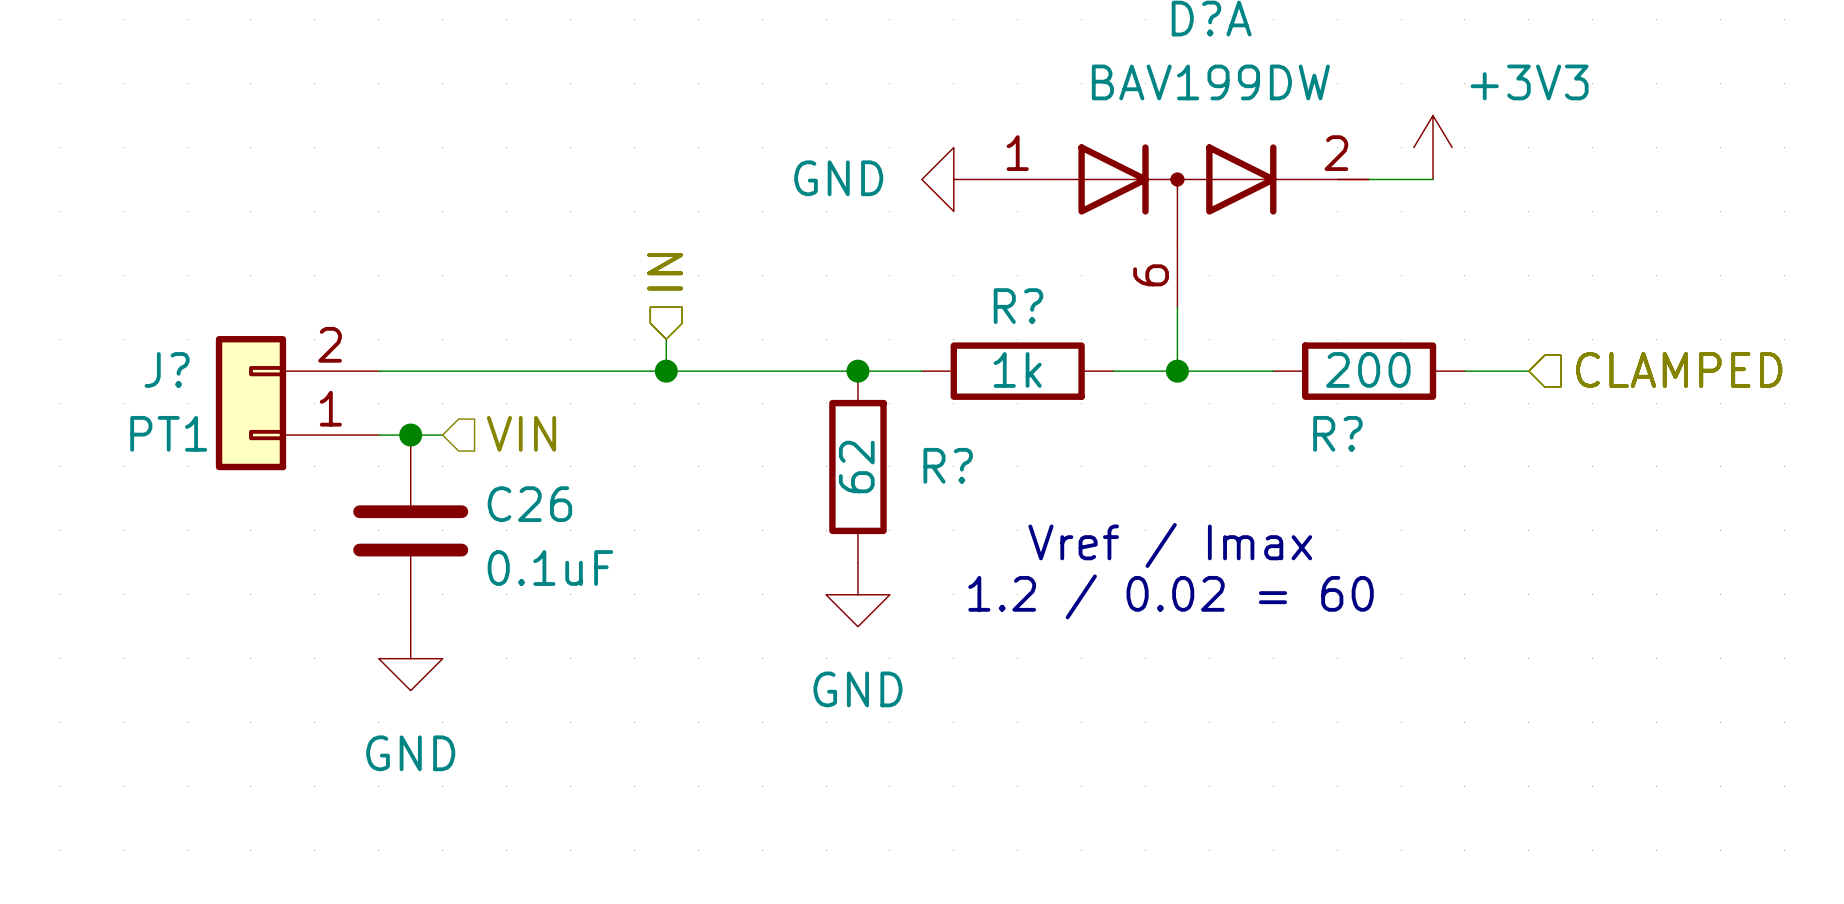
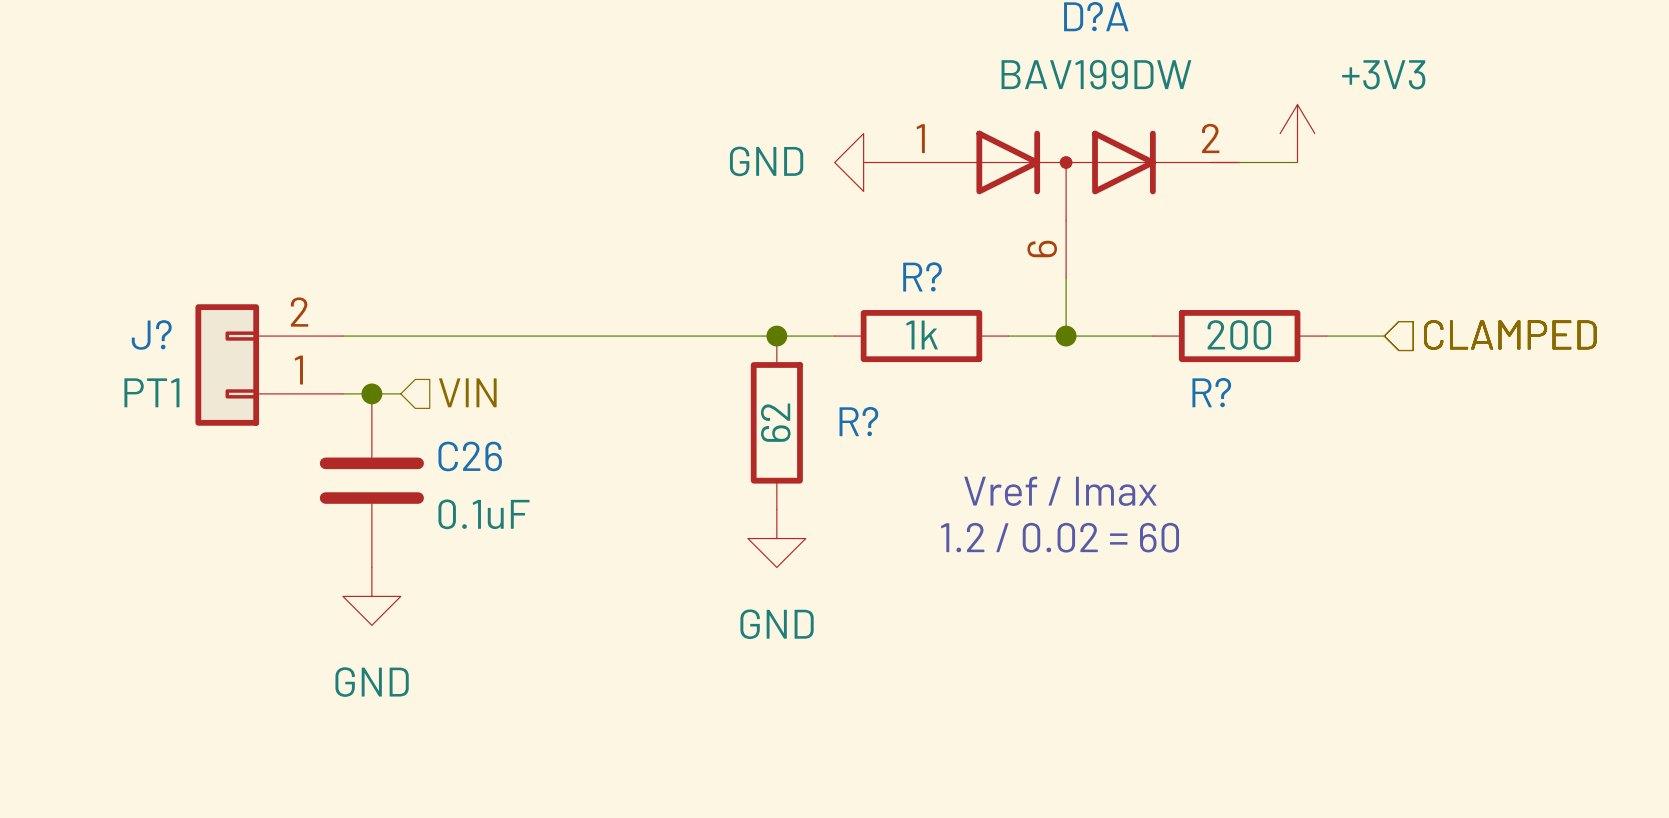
hierarchical label: IN (665, 271) -> none
wire: (666, 339) (666, 371) -> none
junction: (666, 371) -> none

